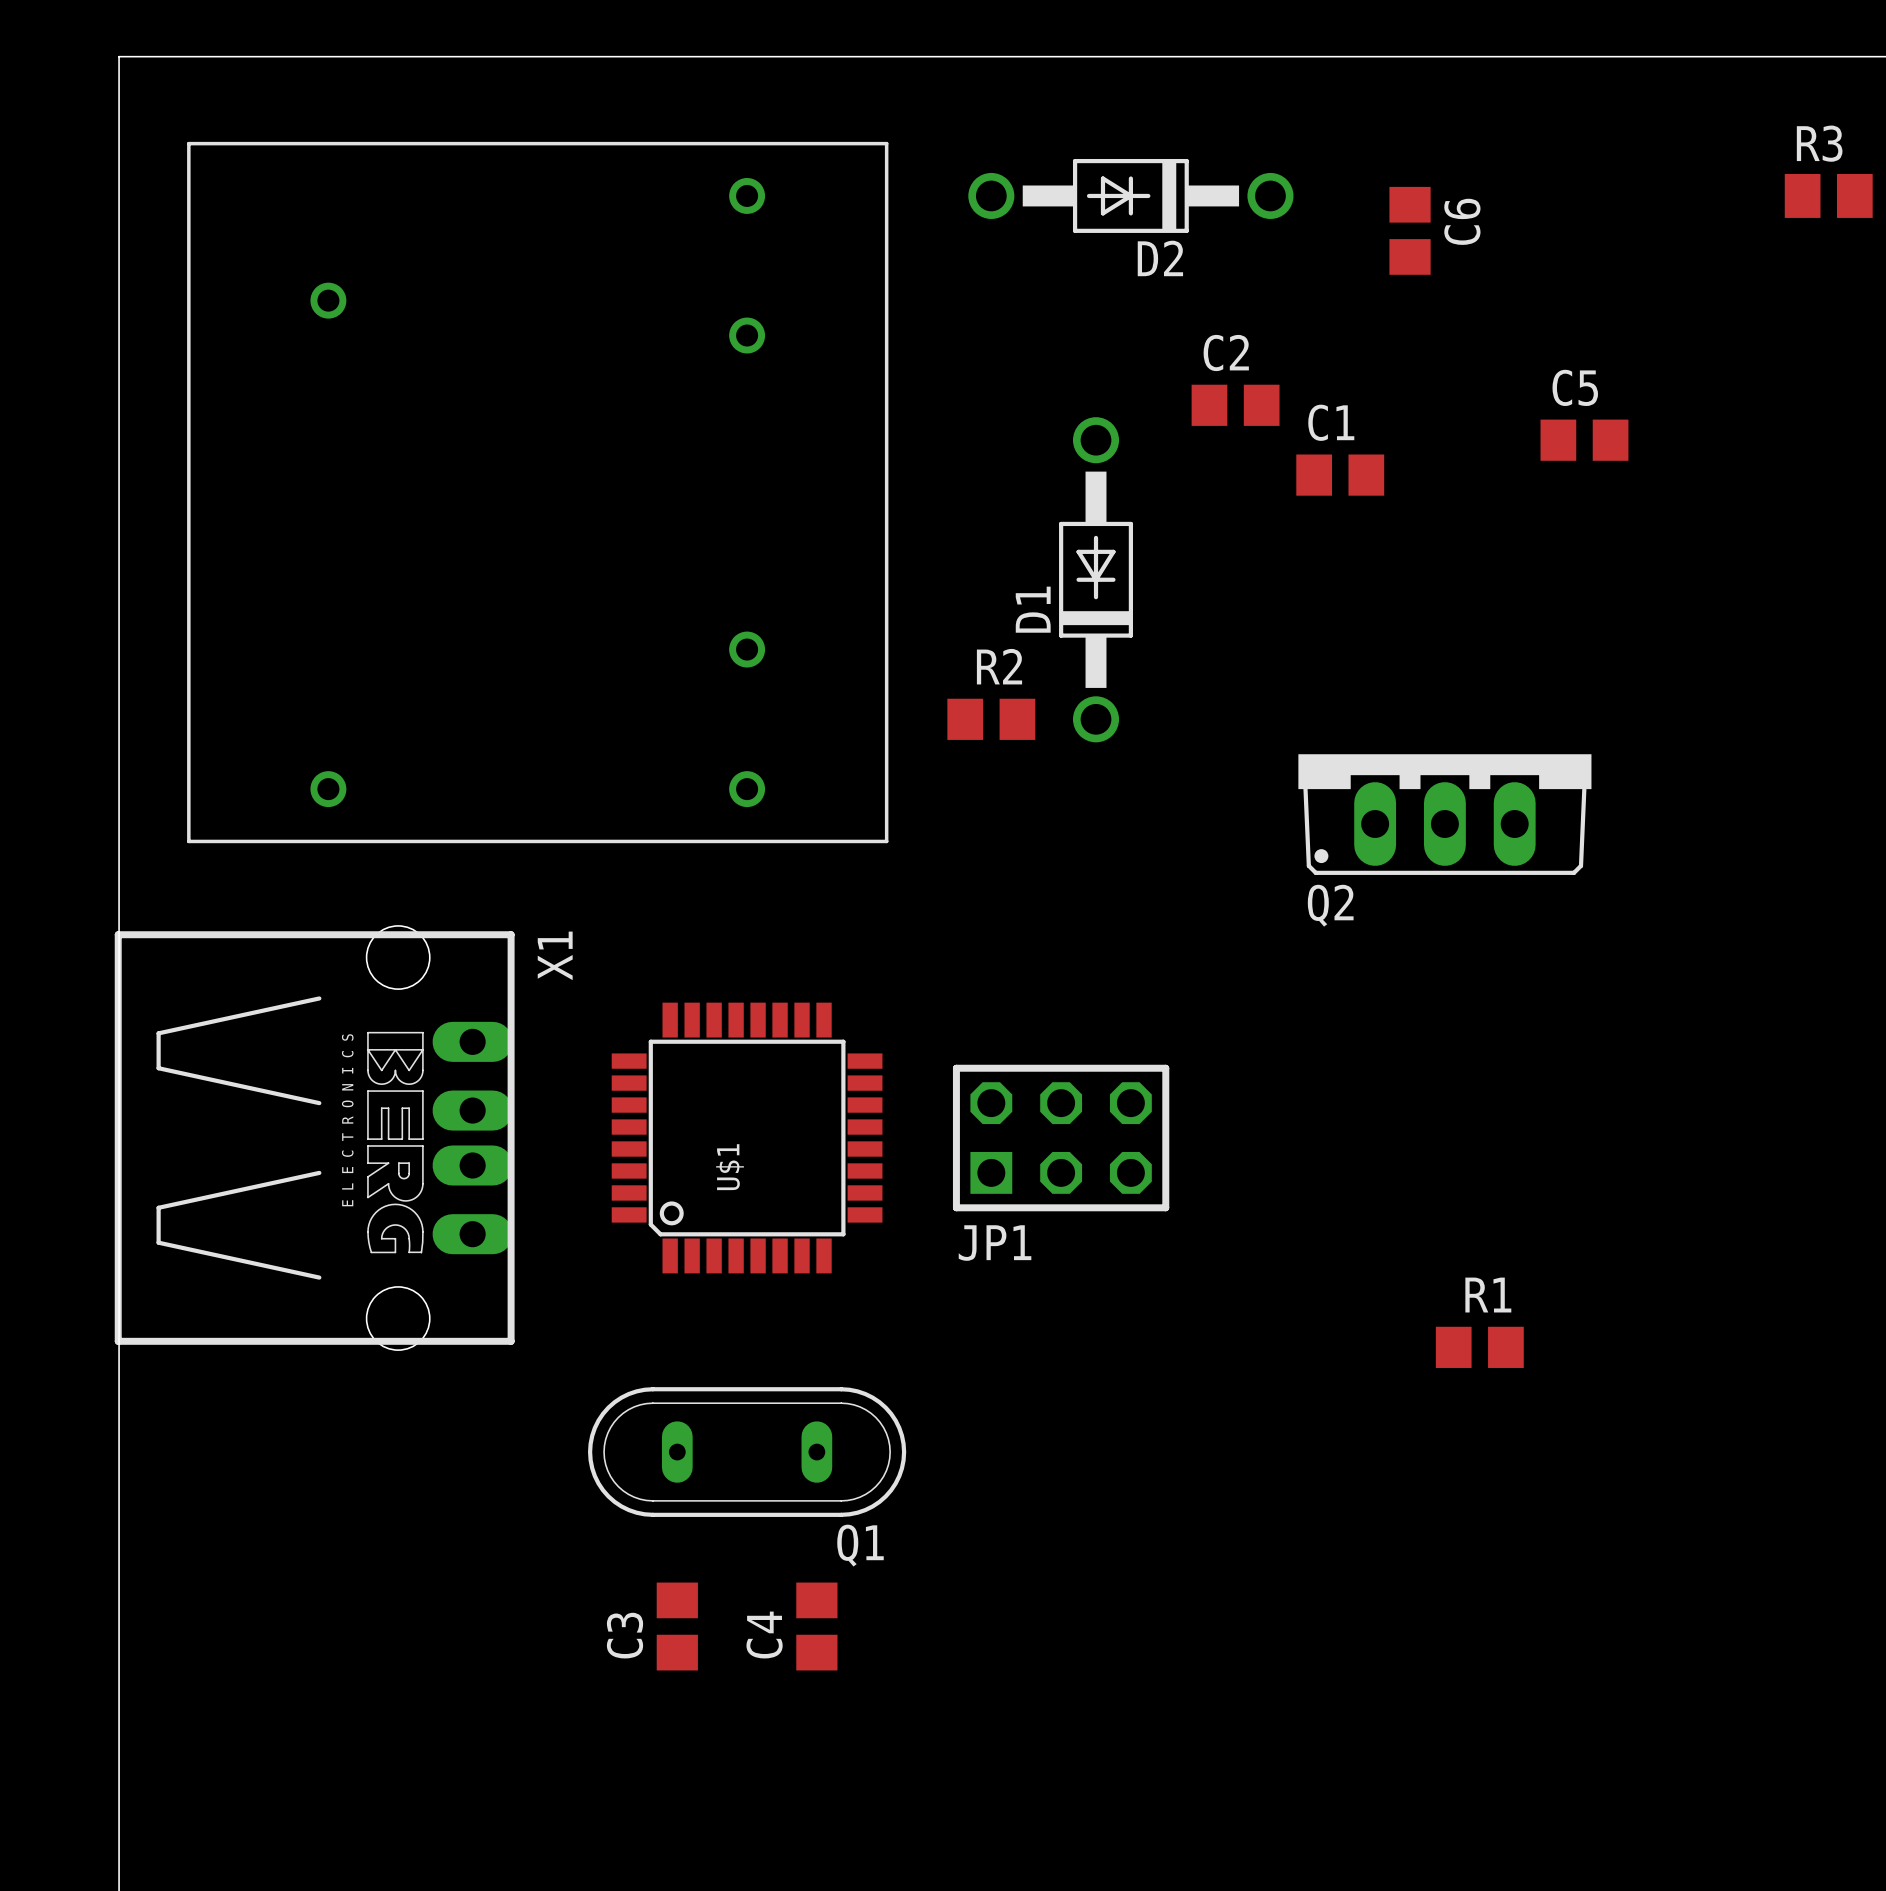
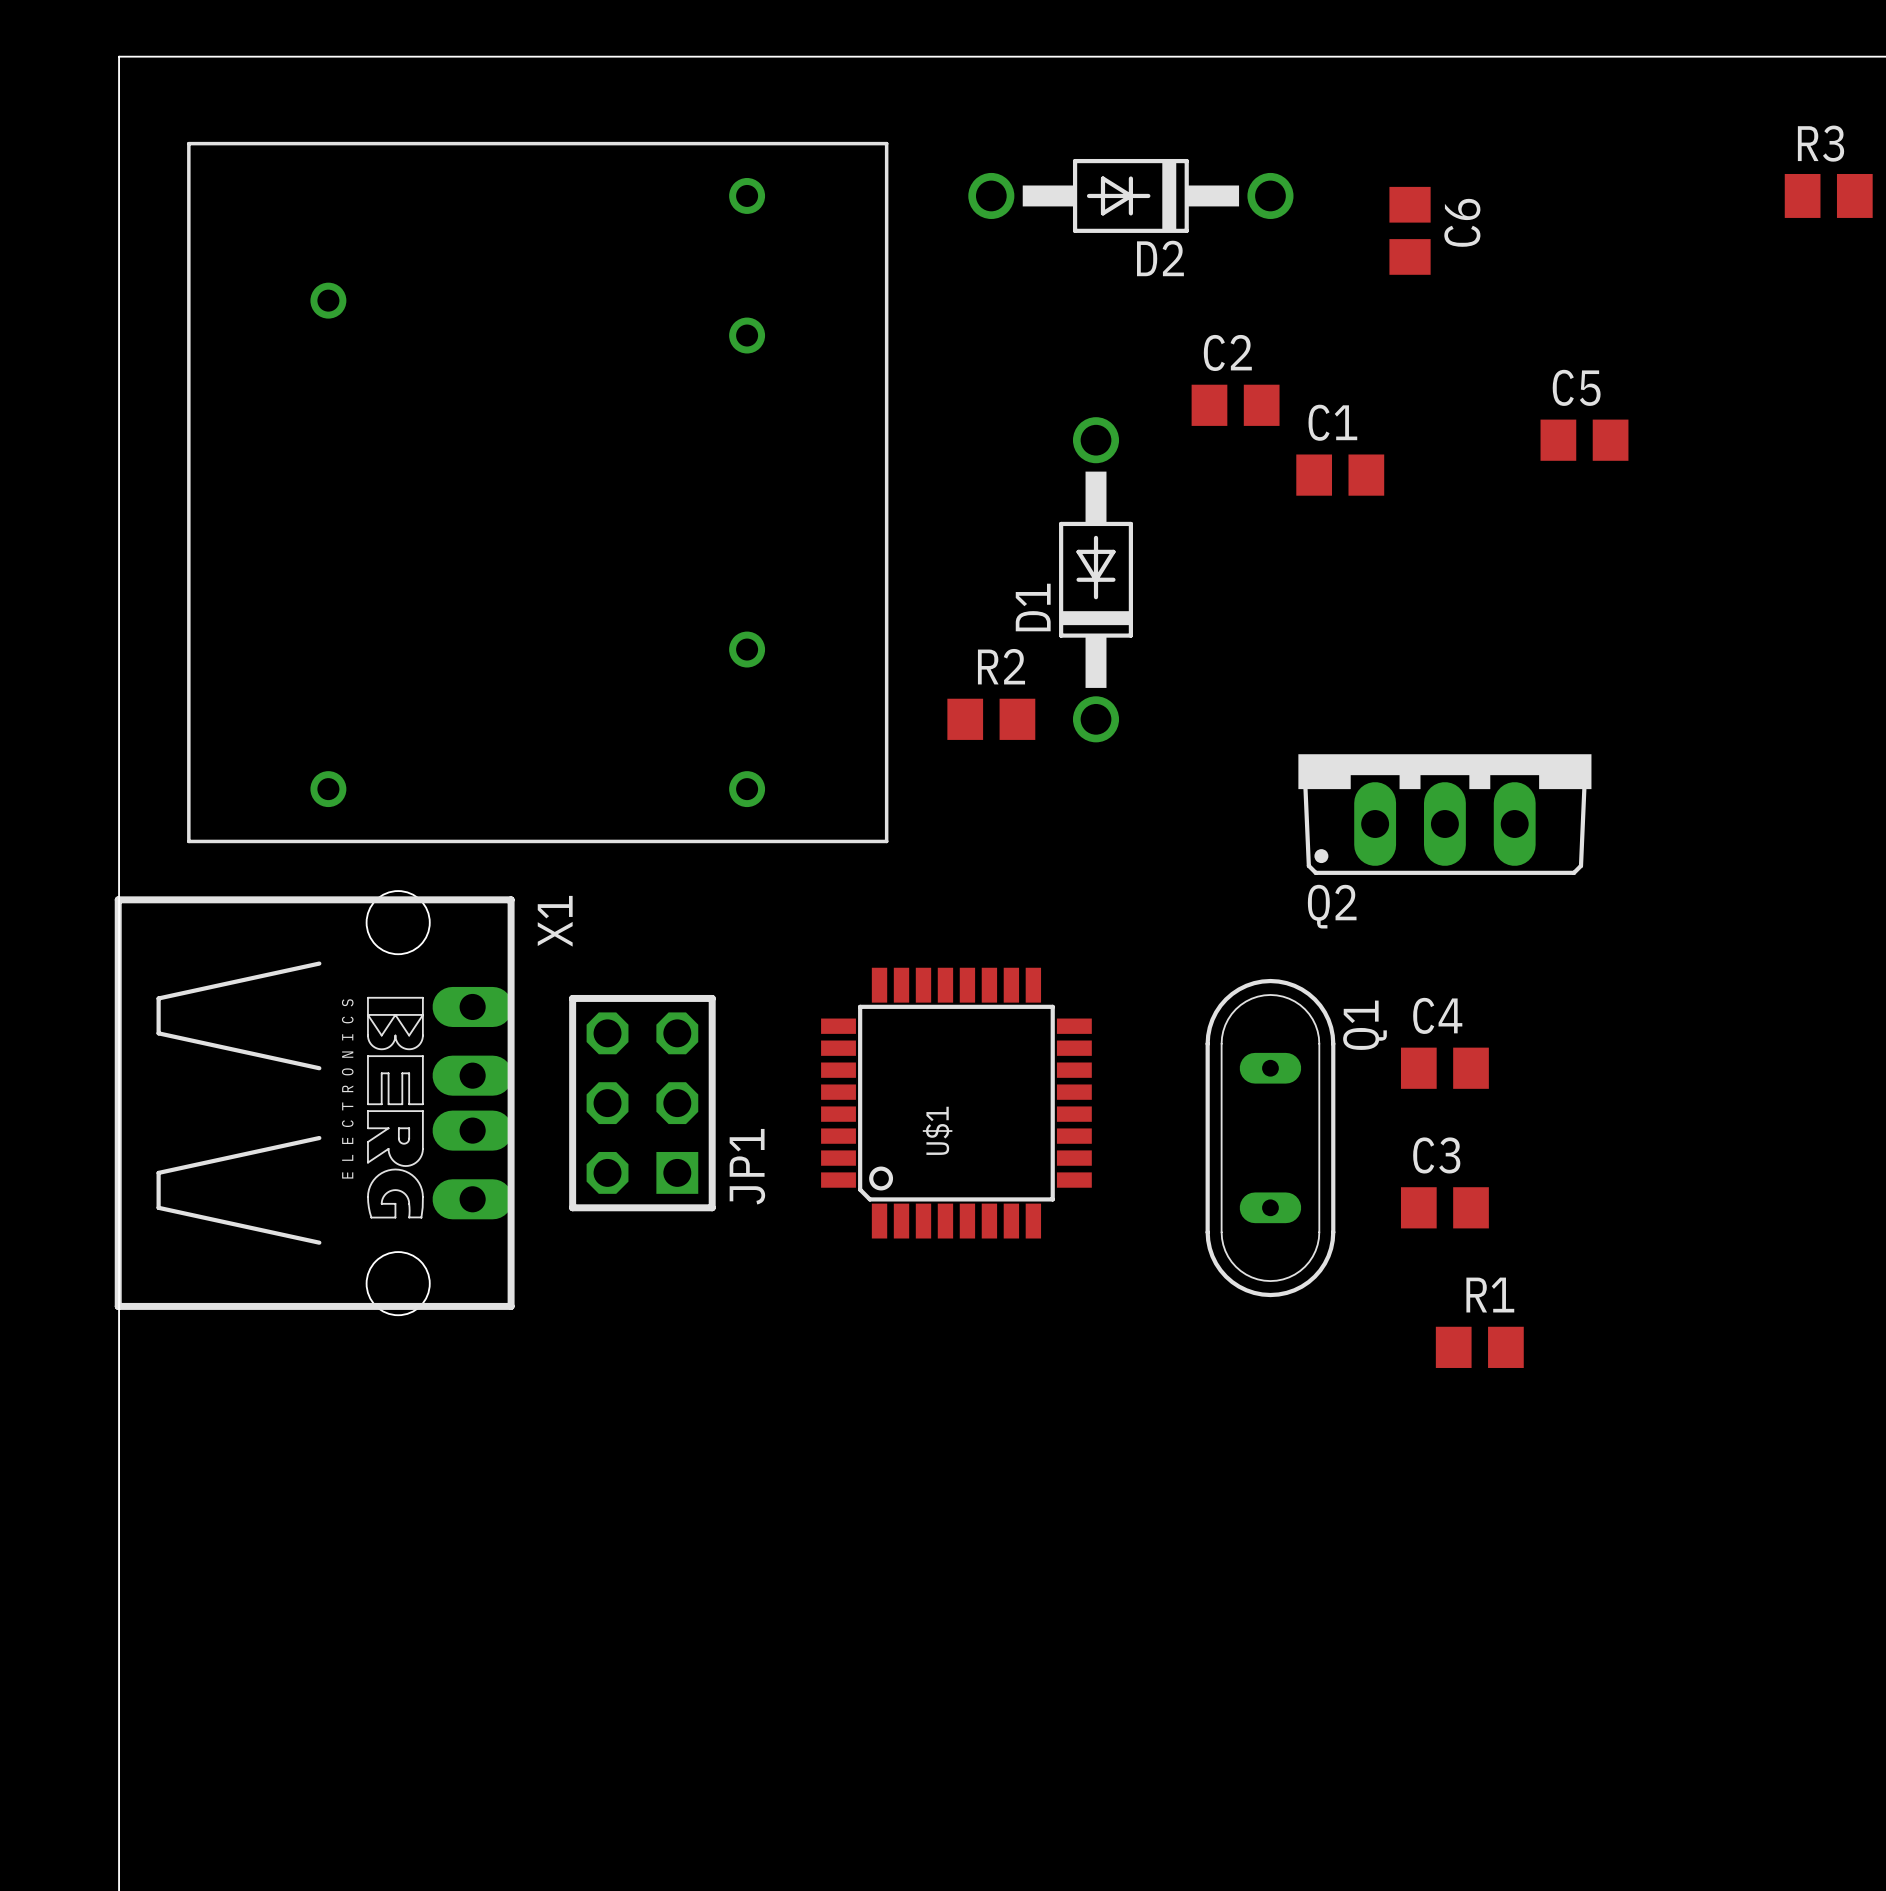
X1 position: (314, 1138) -> (314, 1103)
U$1 position: (747, 1138) -> (956, 1103)
JP1 rotation: 0° (1061, 1138) -> 90° counterclockwise (642, 1103)
JP1 position: (1061, 1138) -> (642, 1103)
Q1 rotation: 0° (747, 1452) -> 90° clockwise (1270, 1138)
Q1 position: (747, 1452) -> (1270, 1138)
Q1 name position: Q1 (860, 1545) -> Q1 (1364, 1025)
C3 rotation: 0° (677, 1626) -> 90° clockwise (1444, 1207)
C3 position: (677, 1626) -> (1444, 1207)
C4 rotation: 0° (816, 1626) -> 90° clockwise (1444, 1068)
C4 position: (816, 1626) -> (1444, 1068)

